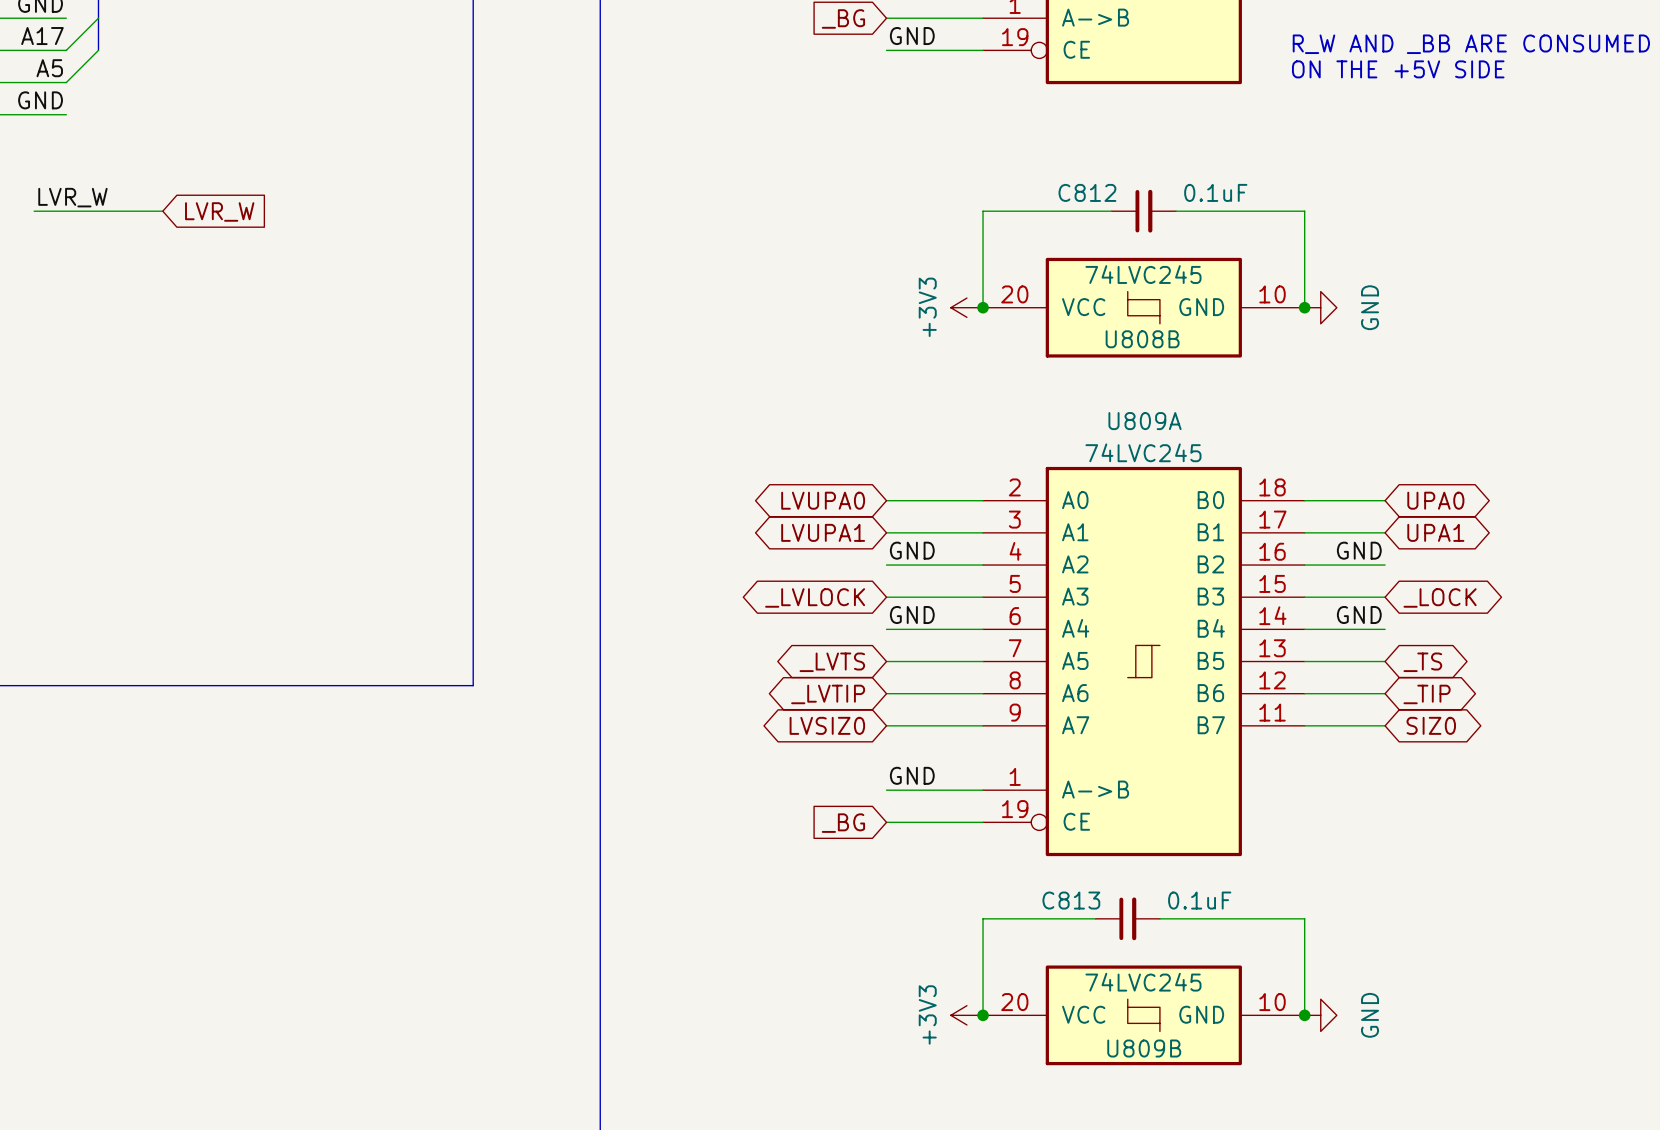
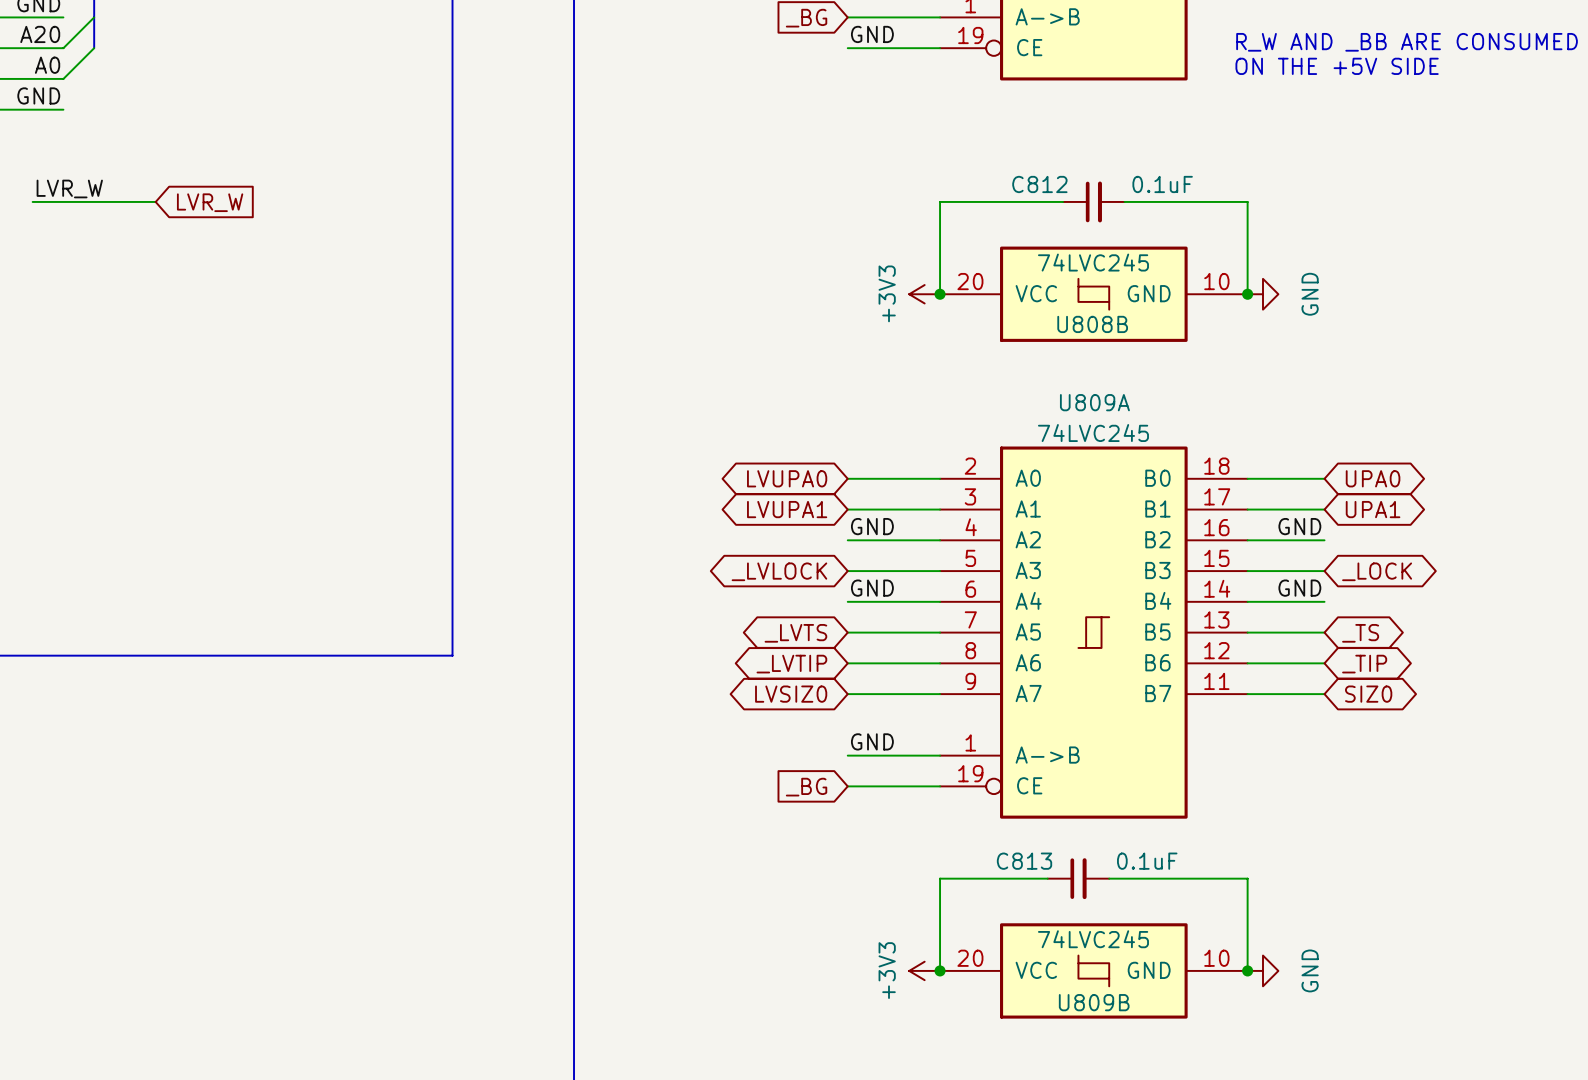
label: A17 (42, 36) -> A20 (40, 34)
label: A5 (49, 68) -> A0 (47, 65)

